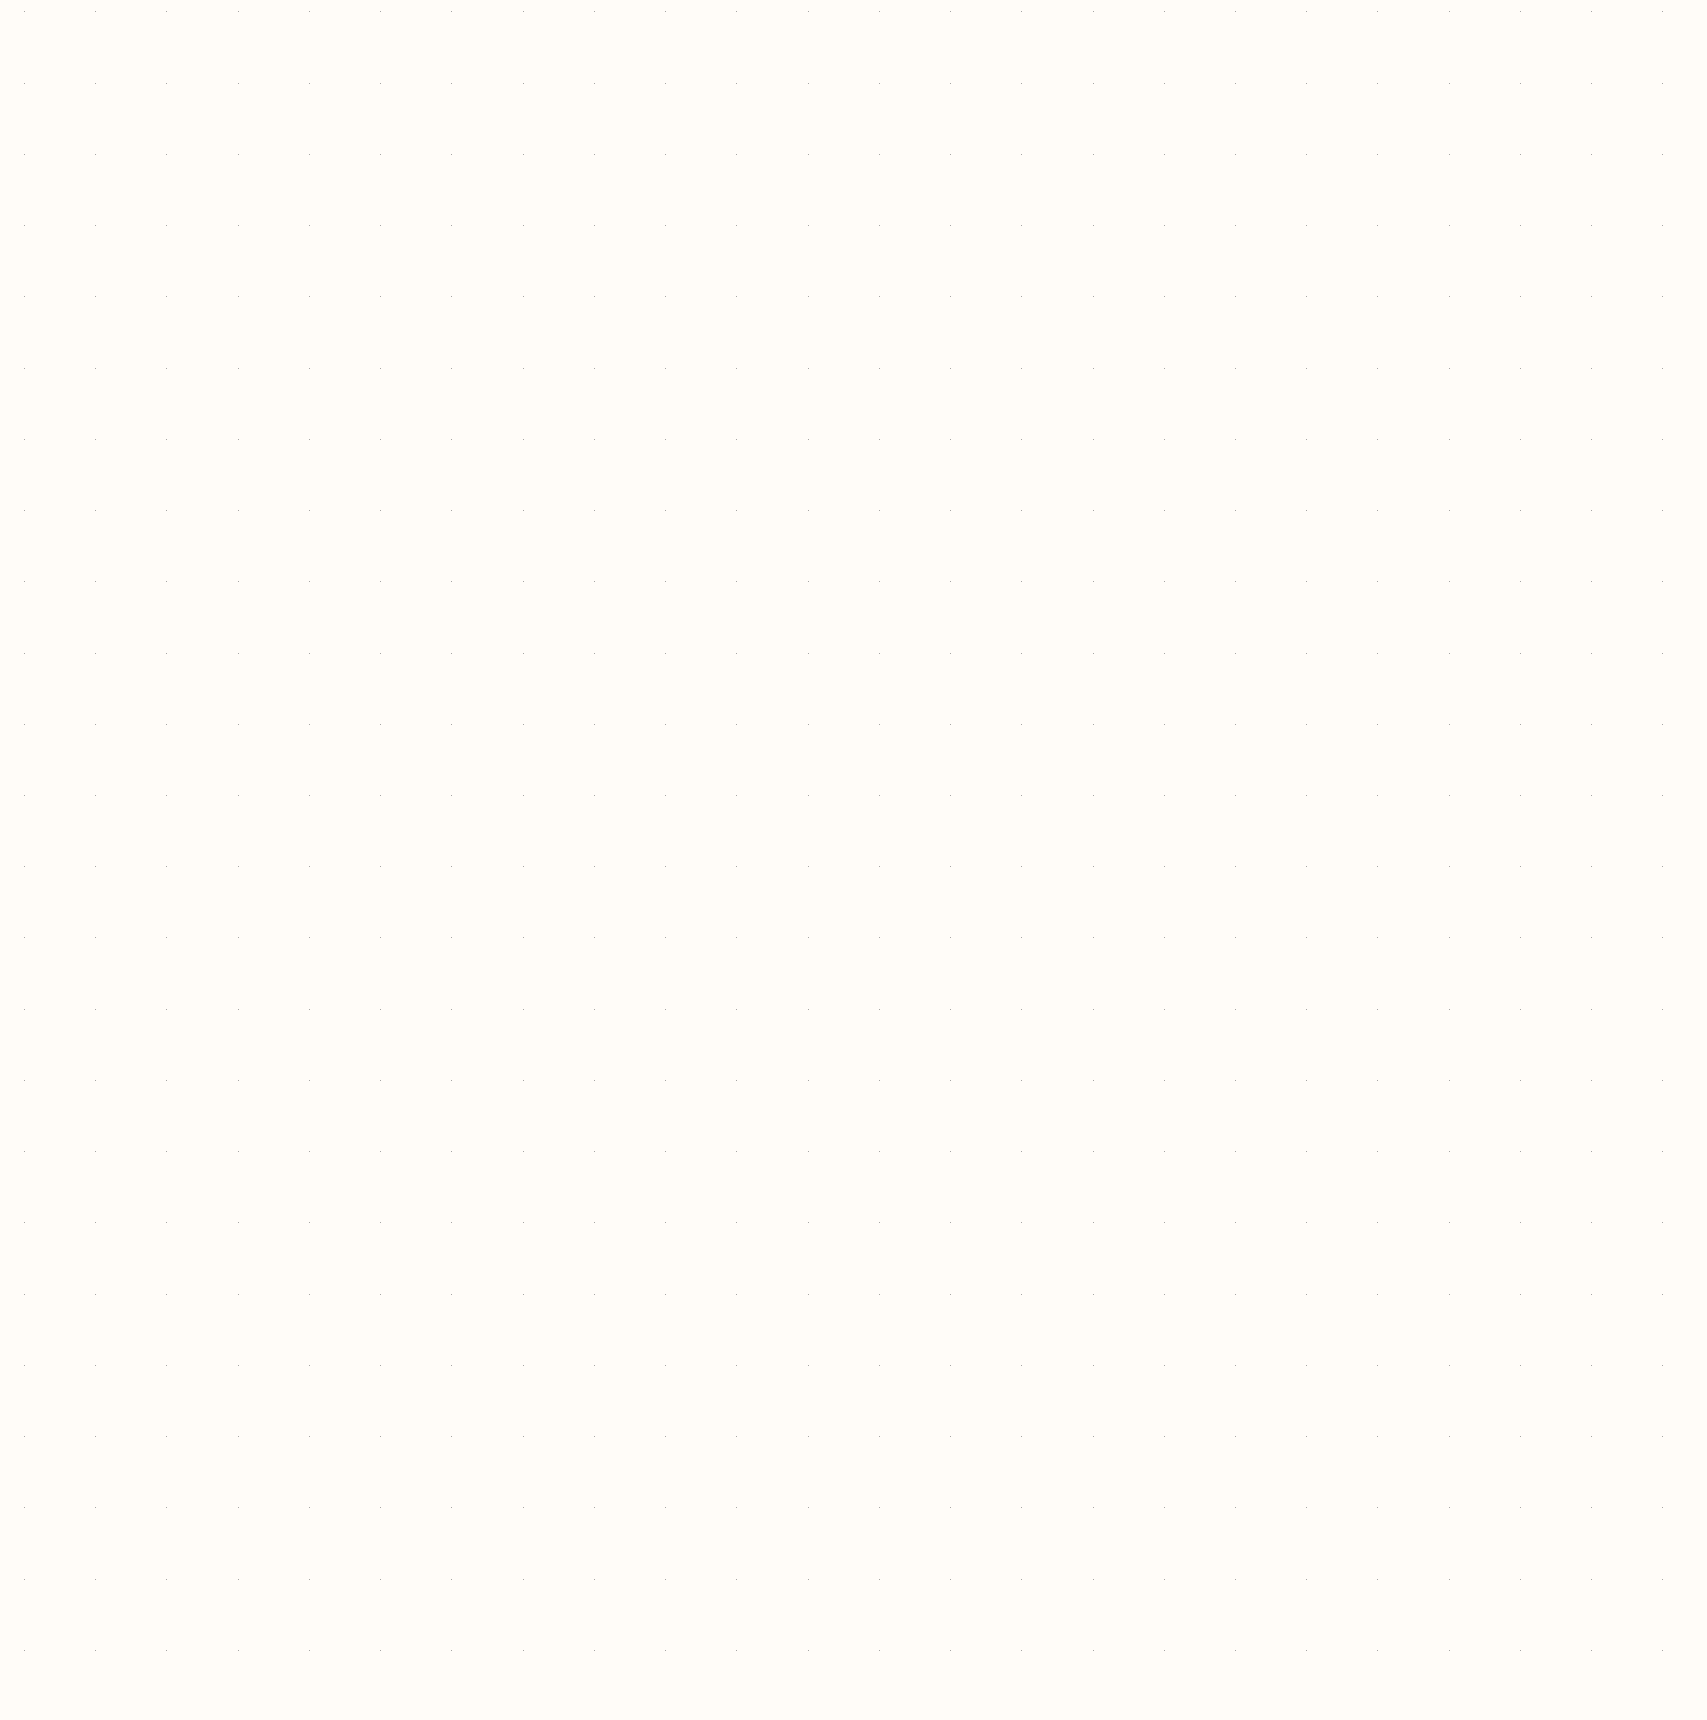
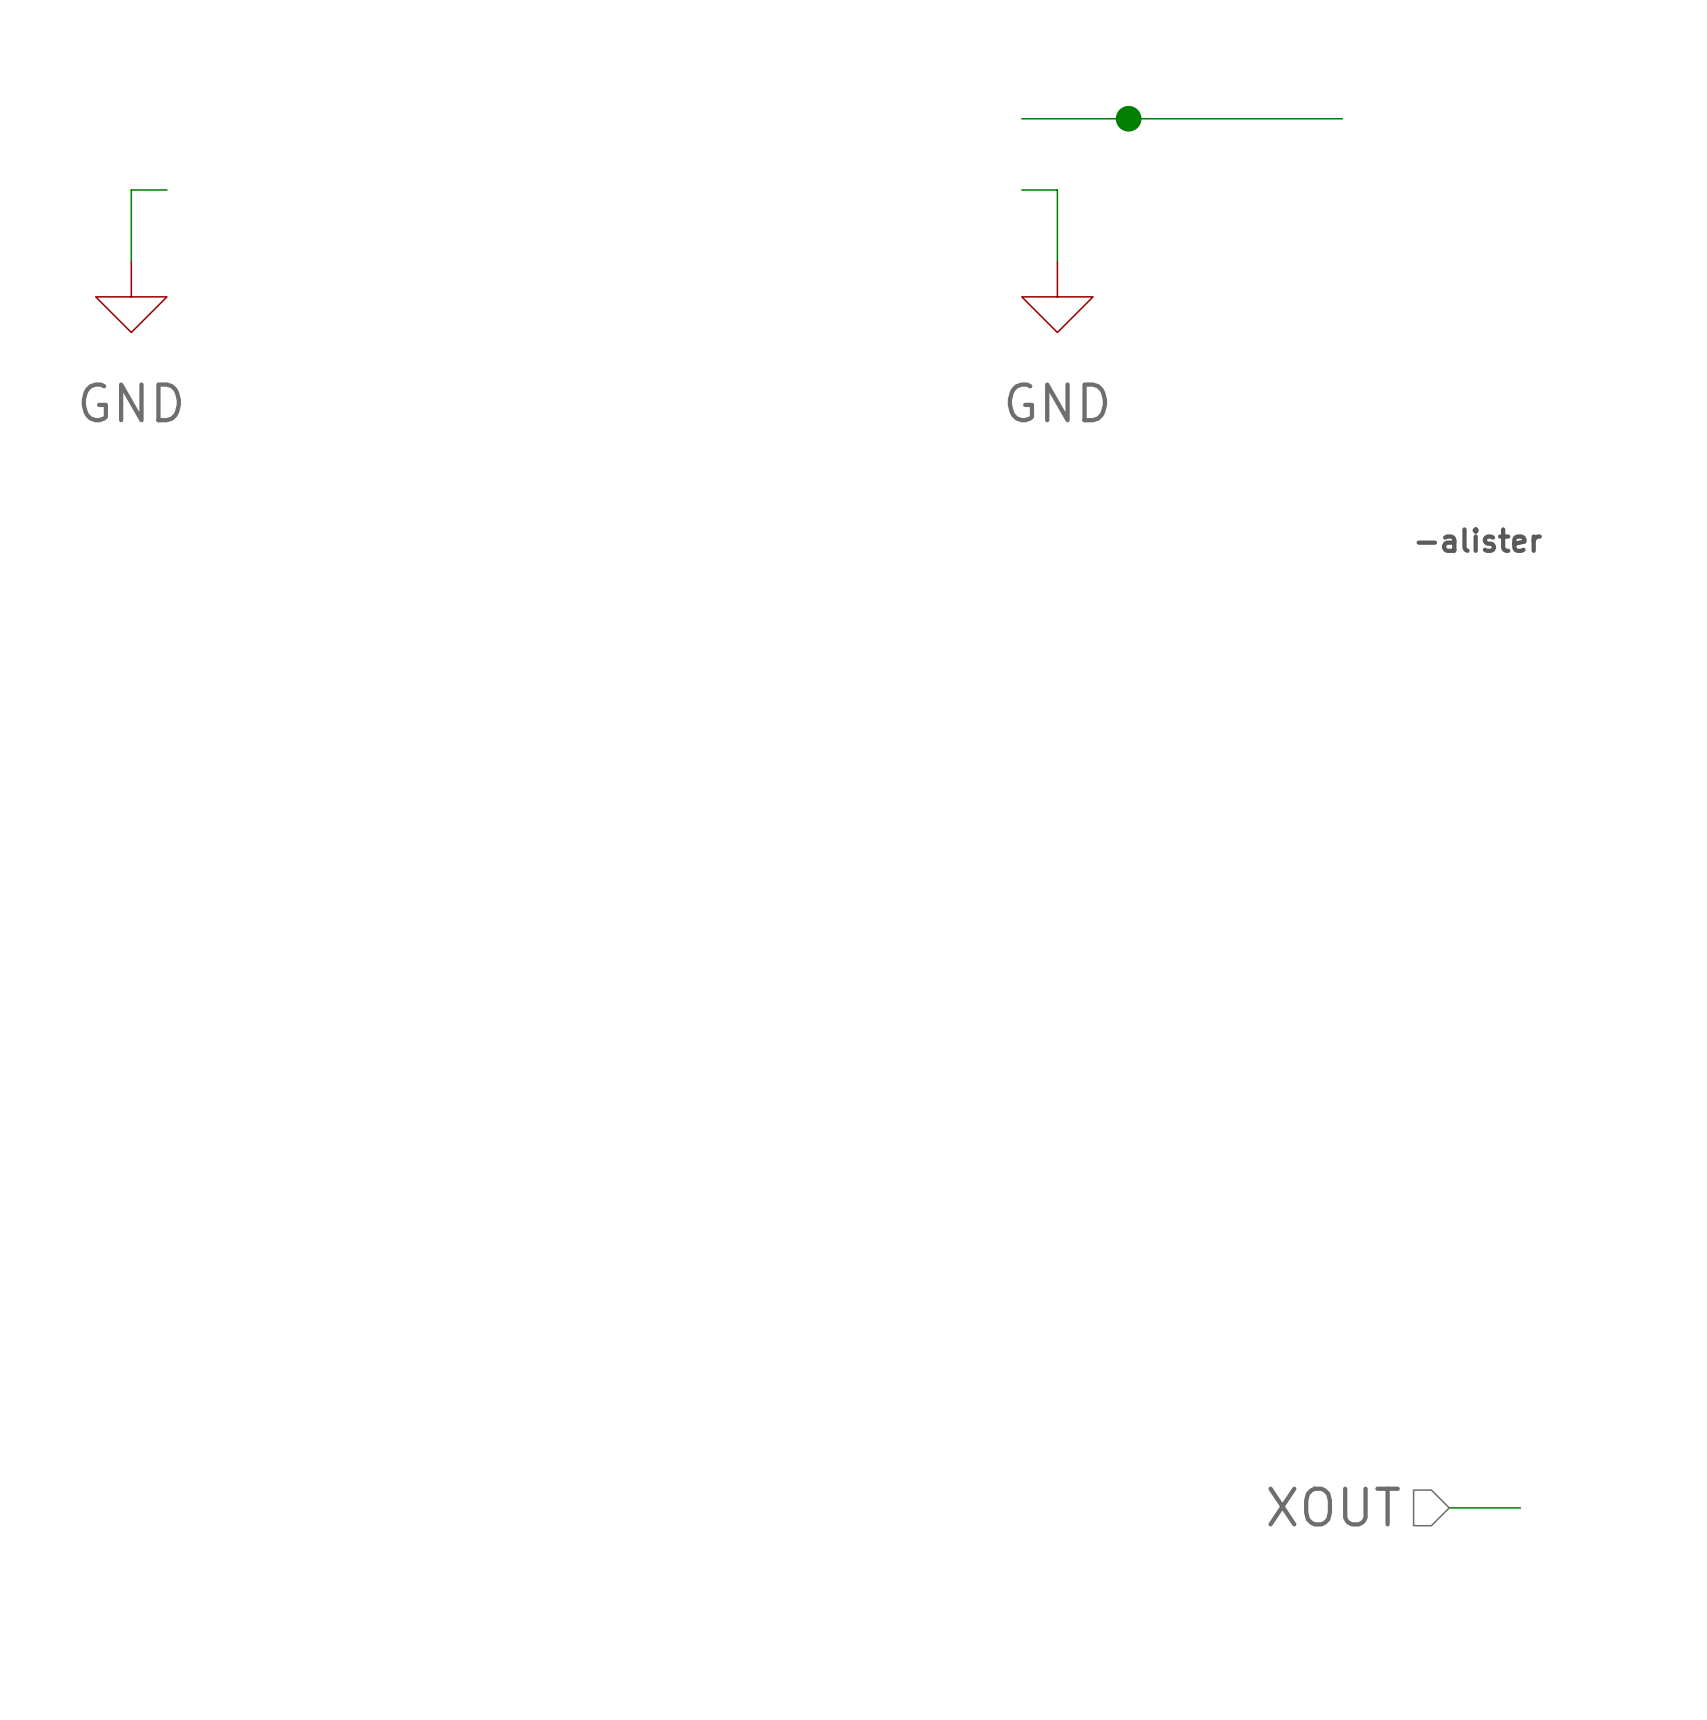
wire: none -> (1021, 118) (1342, 118)
junction: none -> (1128, 118)
wire: none -> (166, 189) (131, 189) (131, 261)
wire: none -> (1021, 189) (1057, 189) (1057, 261)
power symbol: none -> GND (131, 296)
power symbol: none -> GND (1057, 296)
text: none -> -alister (1479, 540)
hierarchical label: none -> XOUT (1334, 1506)
wire: none -> (1449, 1507) (1520, 1507)

